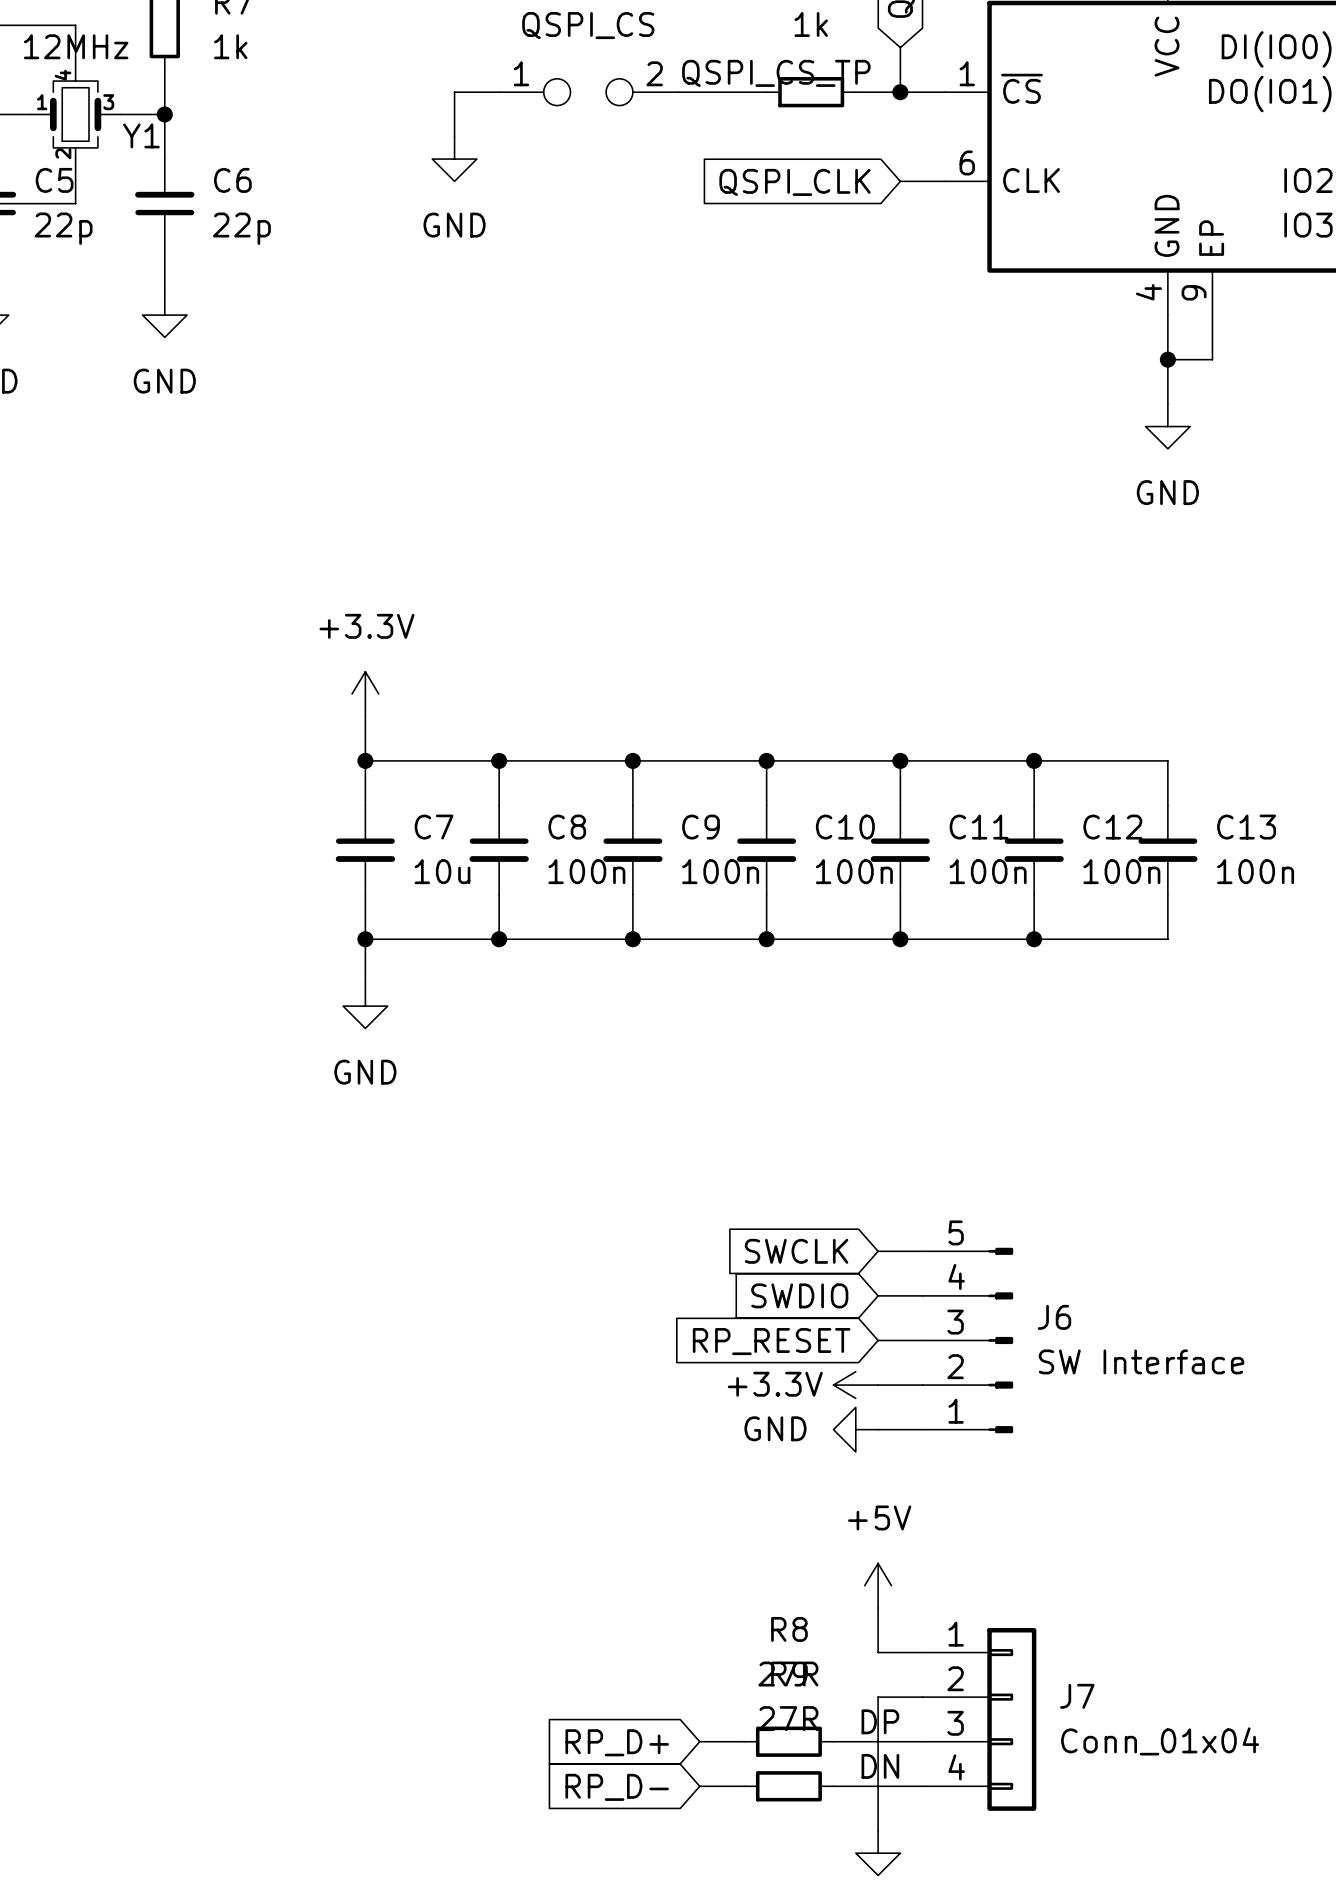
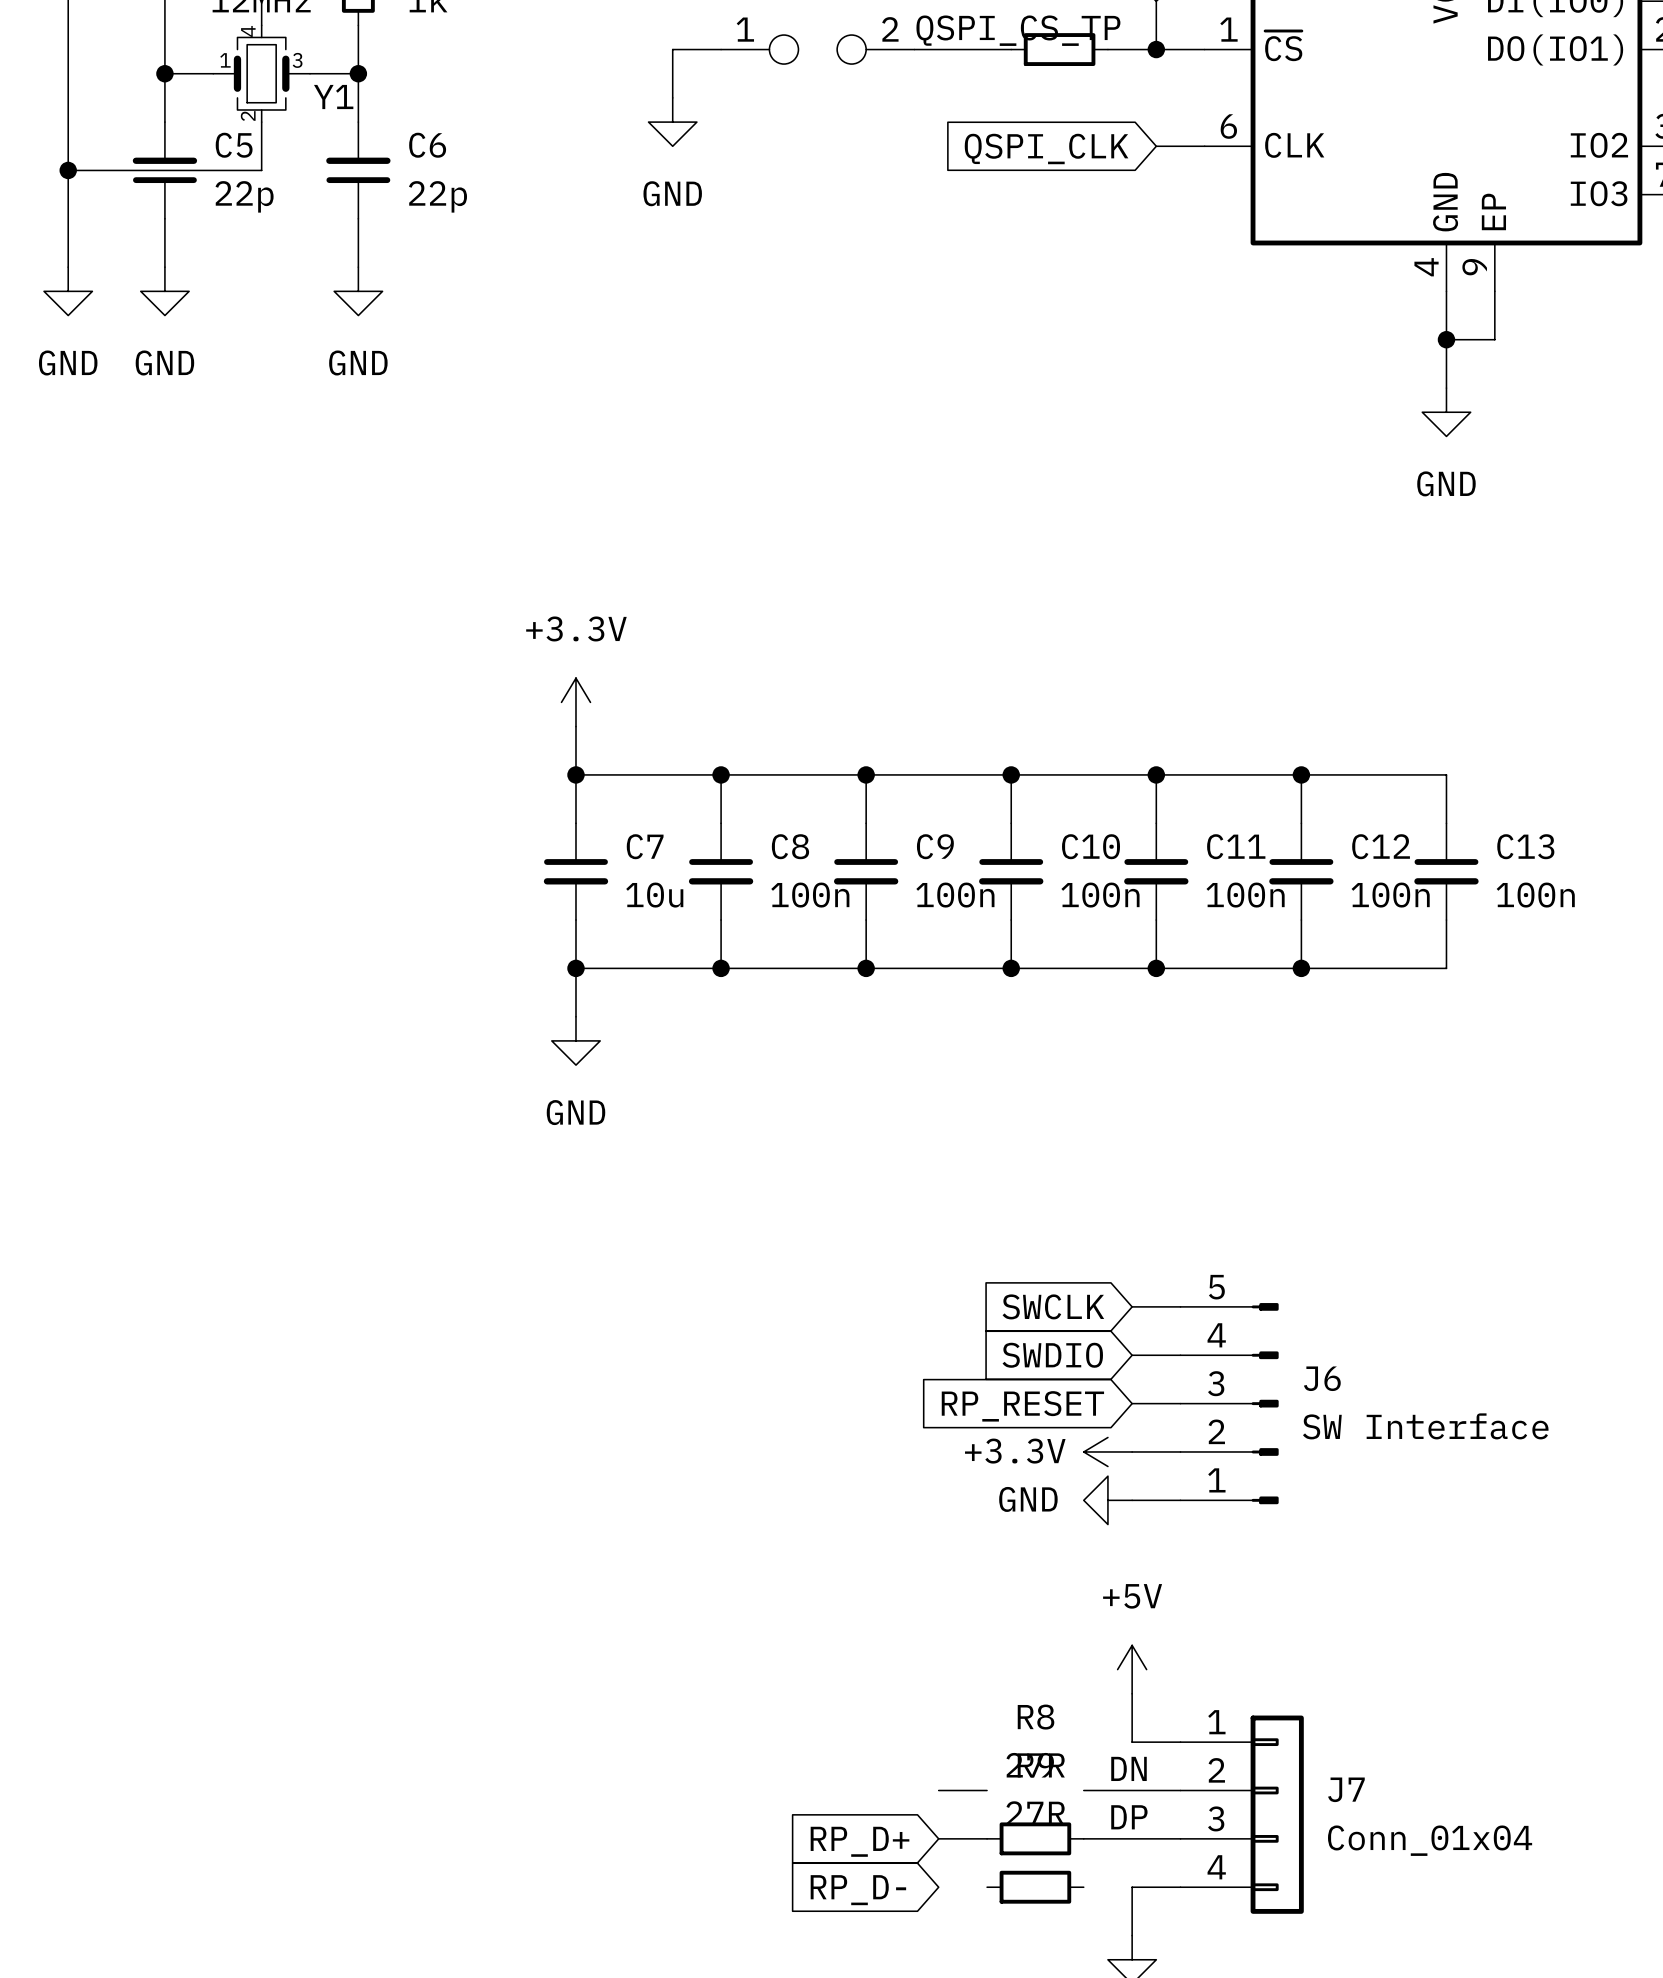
wire: (878, 1697) (878, 1786) (833, 1786) -> (1132, 1790) (1083, 1790)
label position: DN (880, 1766) -> DN (1129, 1768)
wire: (699, 1786) (744, 1786) -> (938, 1790) (987, 1790)

